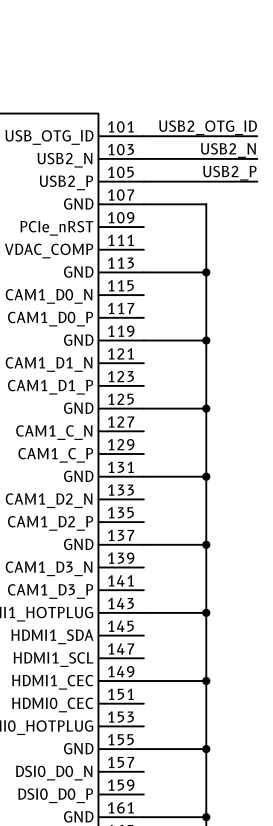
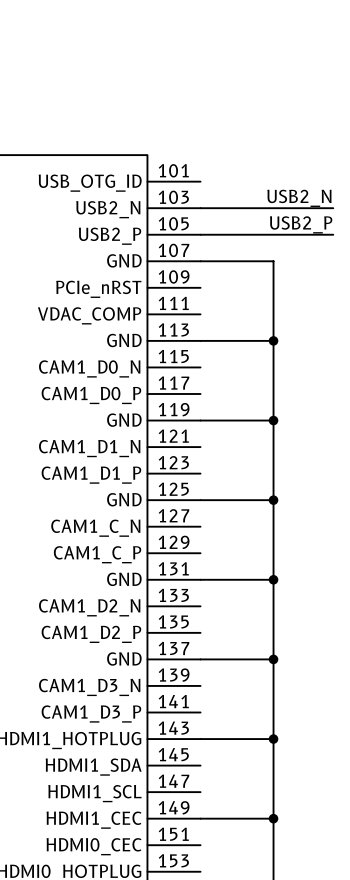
label: USB2_OTG_ID (208, 127) -> none
wire: (143, 136) (257, 136) -> none

